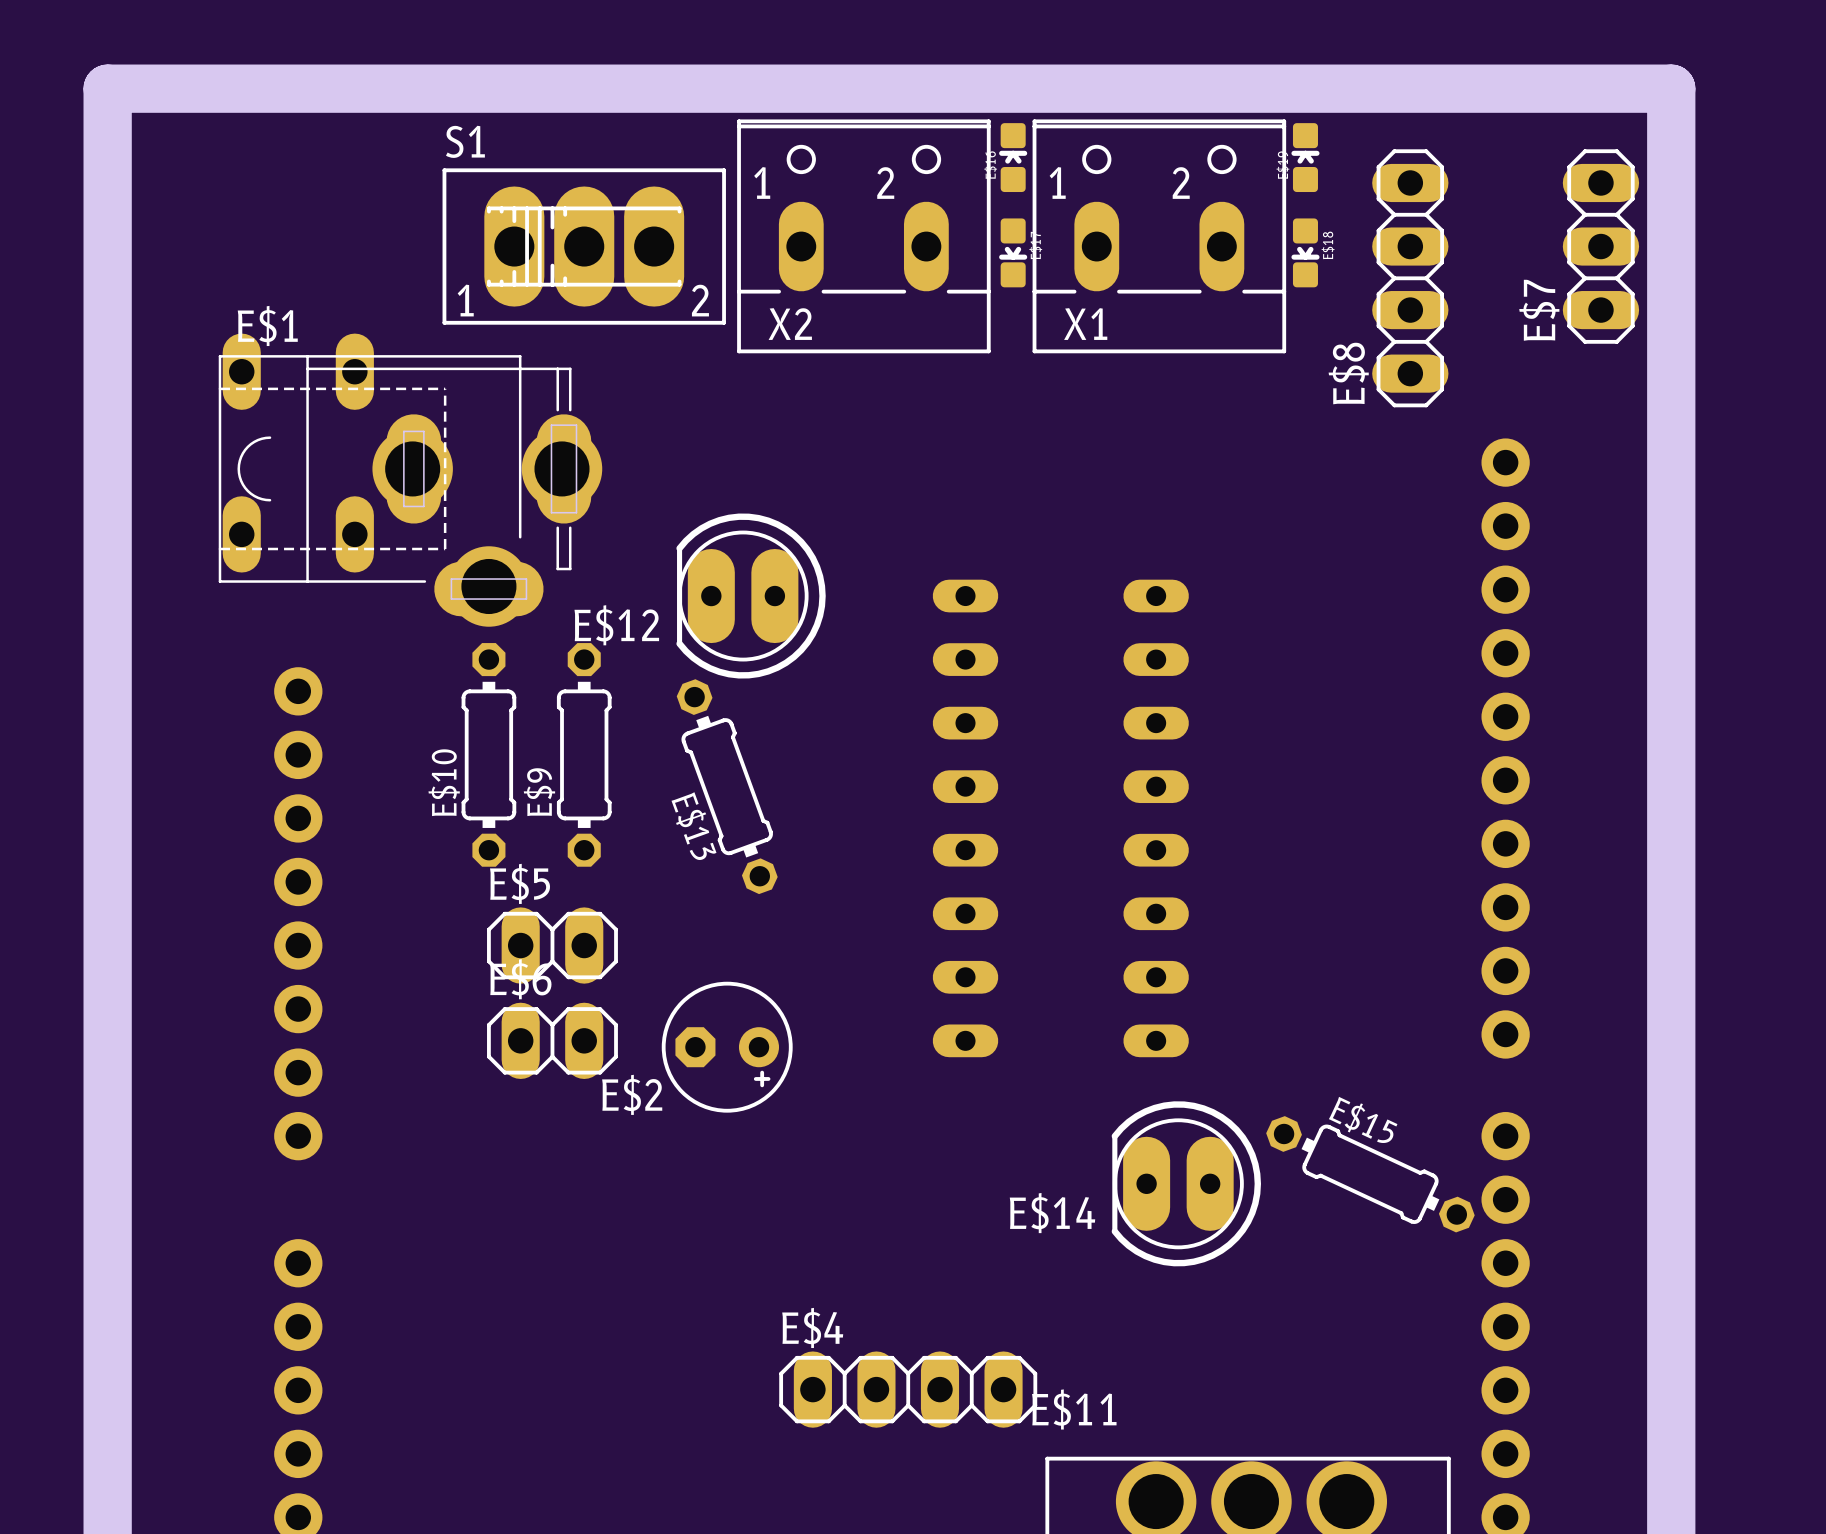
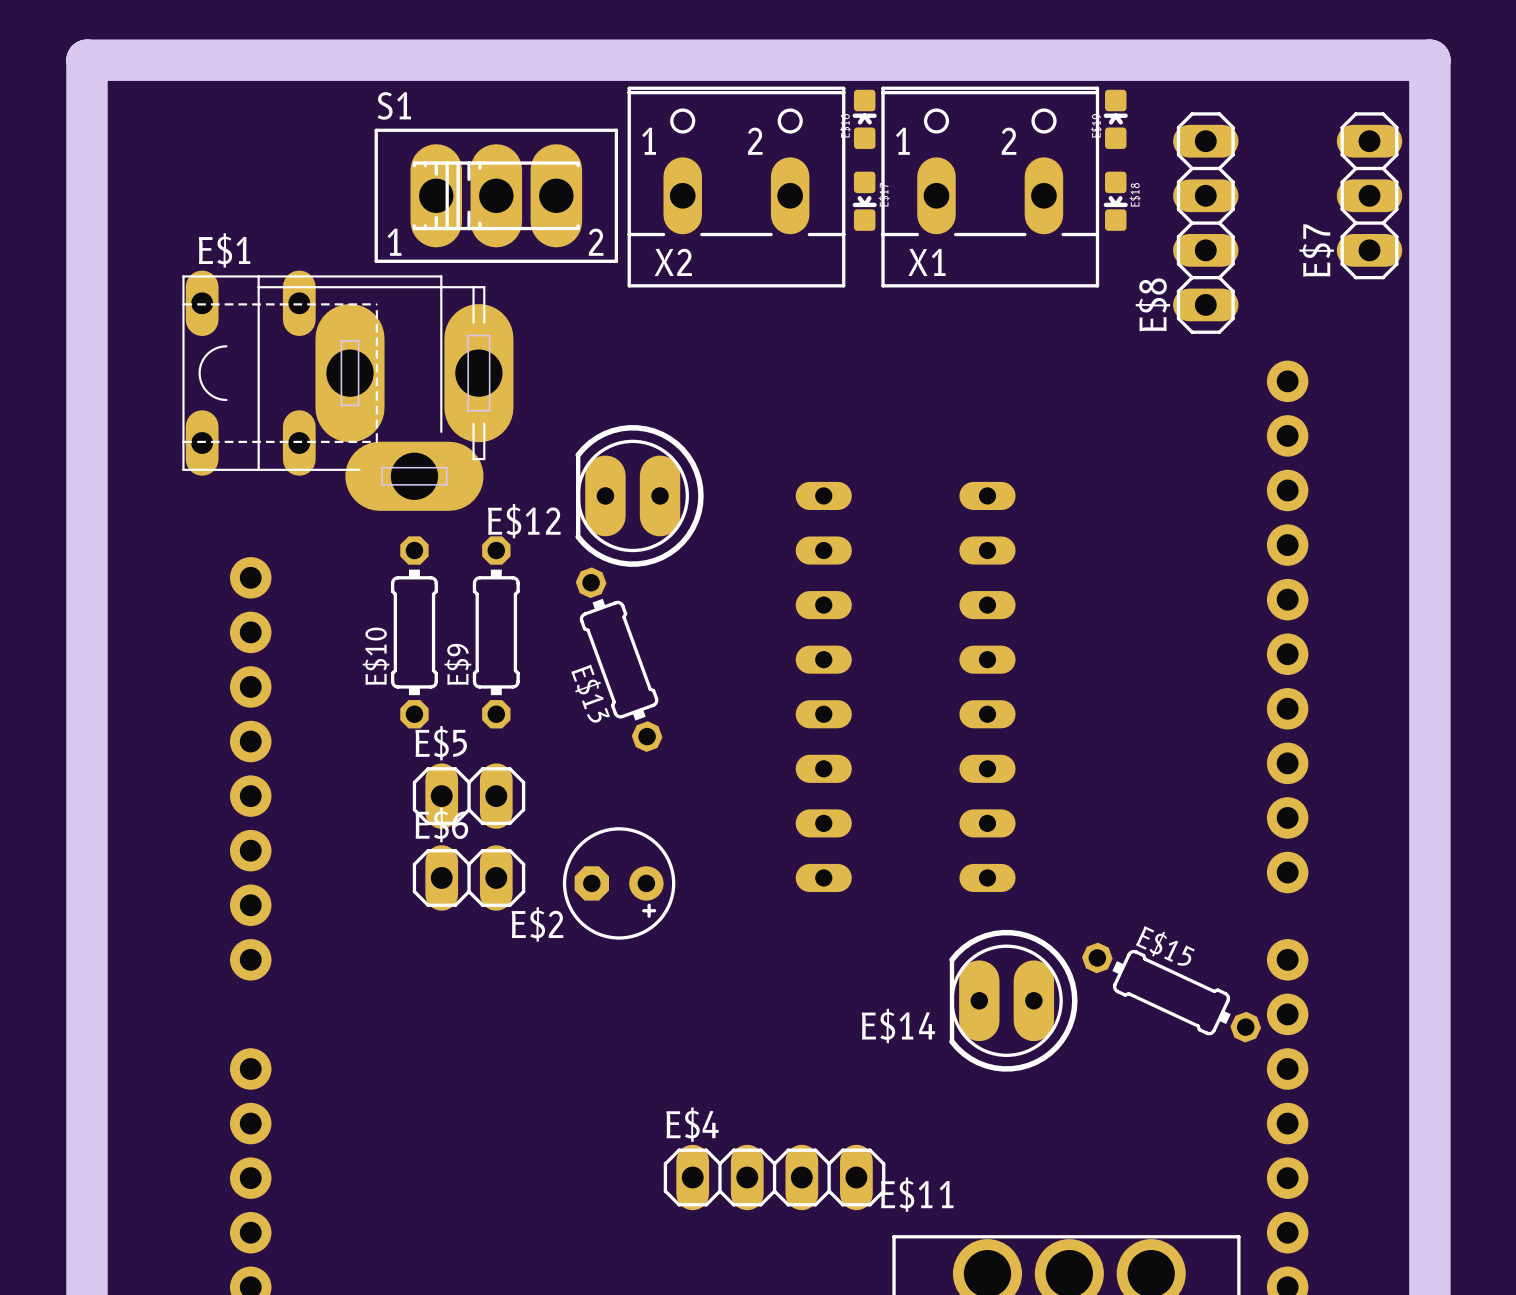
E$1 footprint: [218, 355, 603, 627] -> [182, 275, 514, 511]

